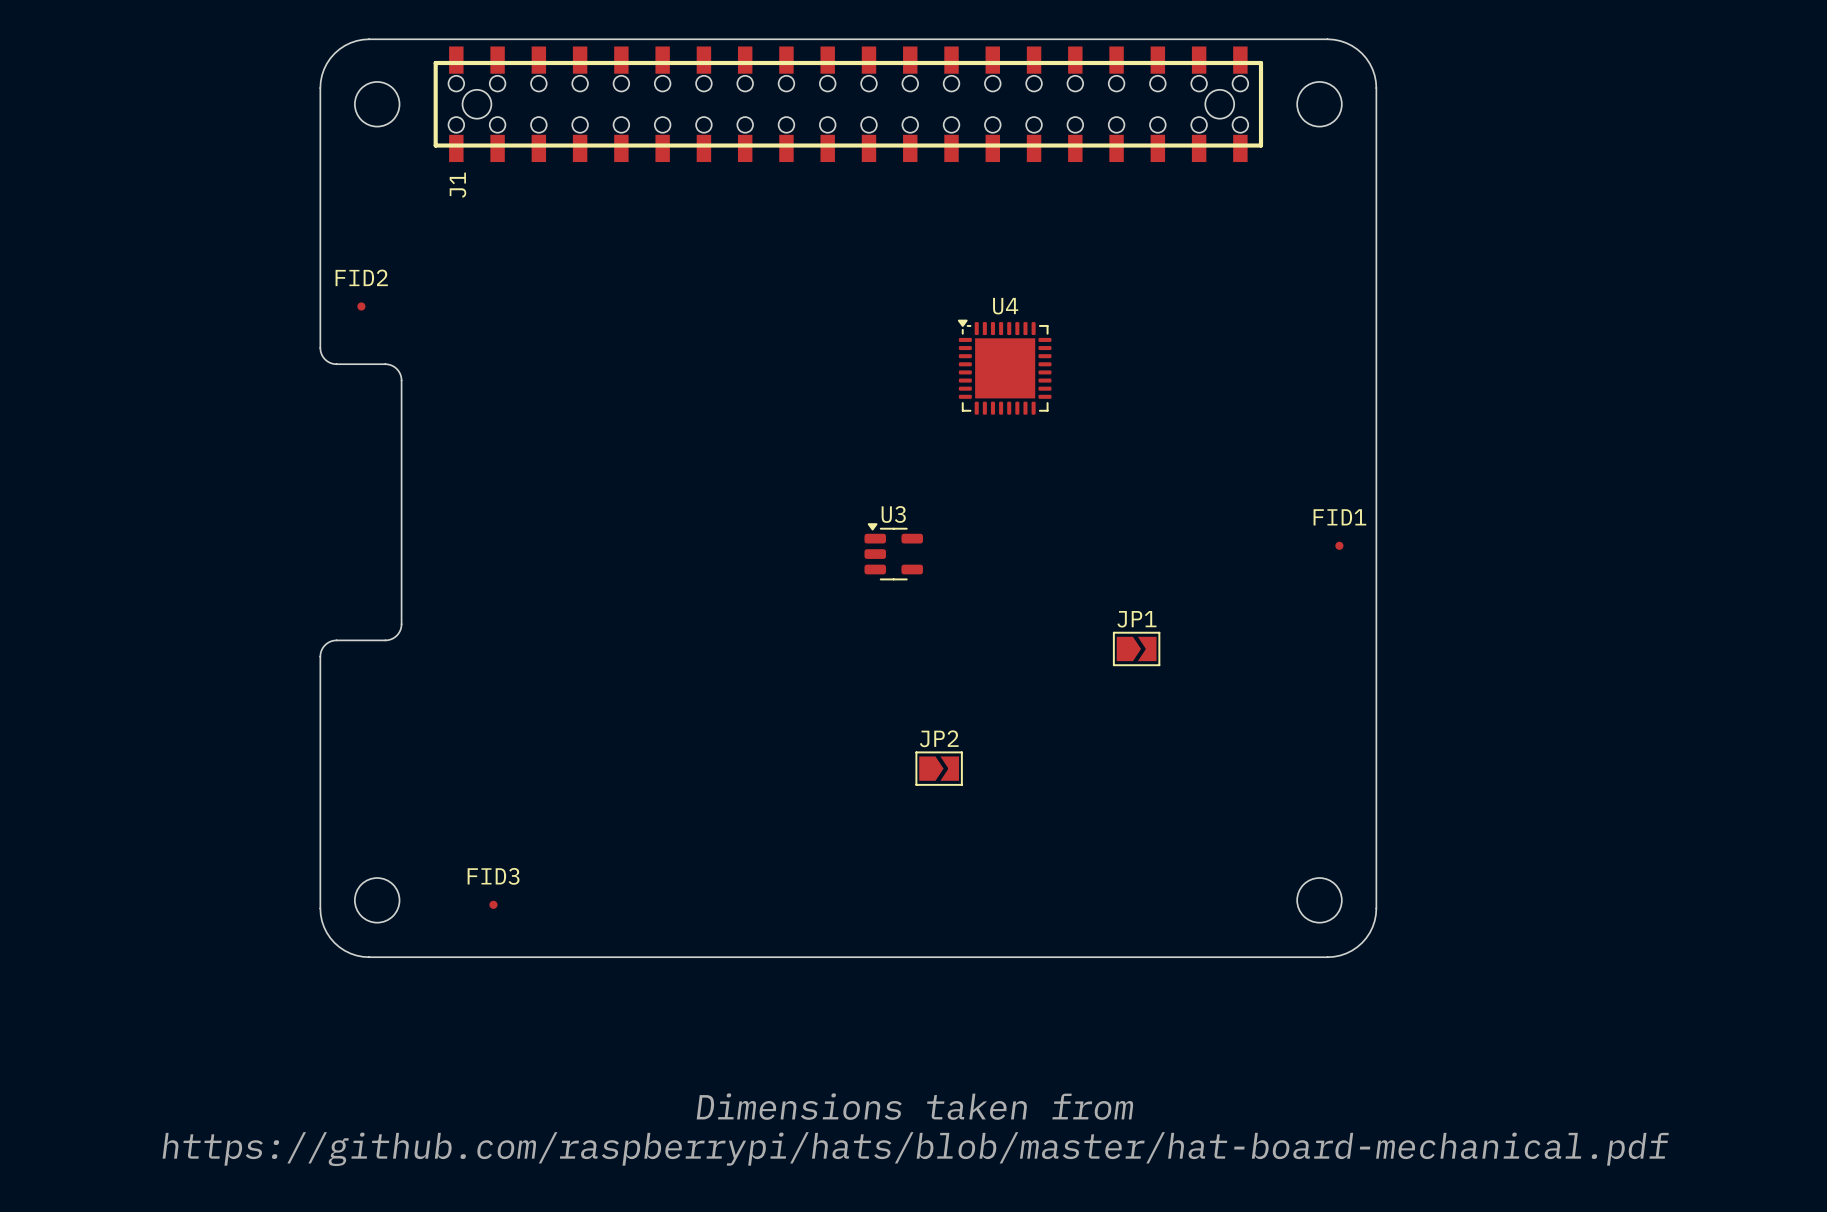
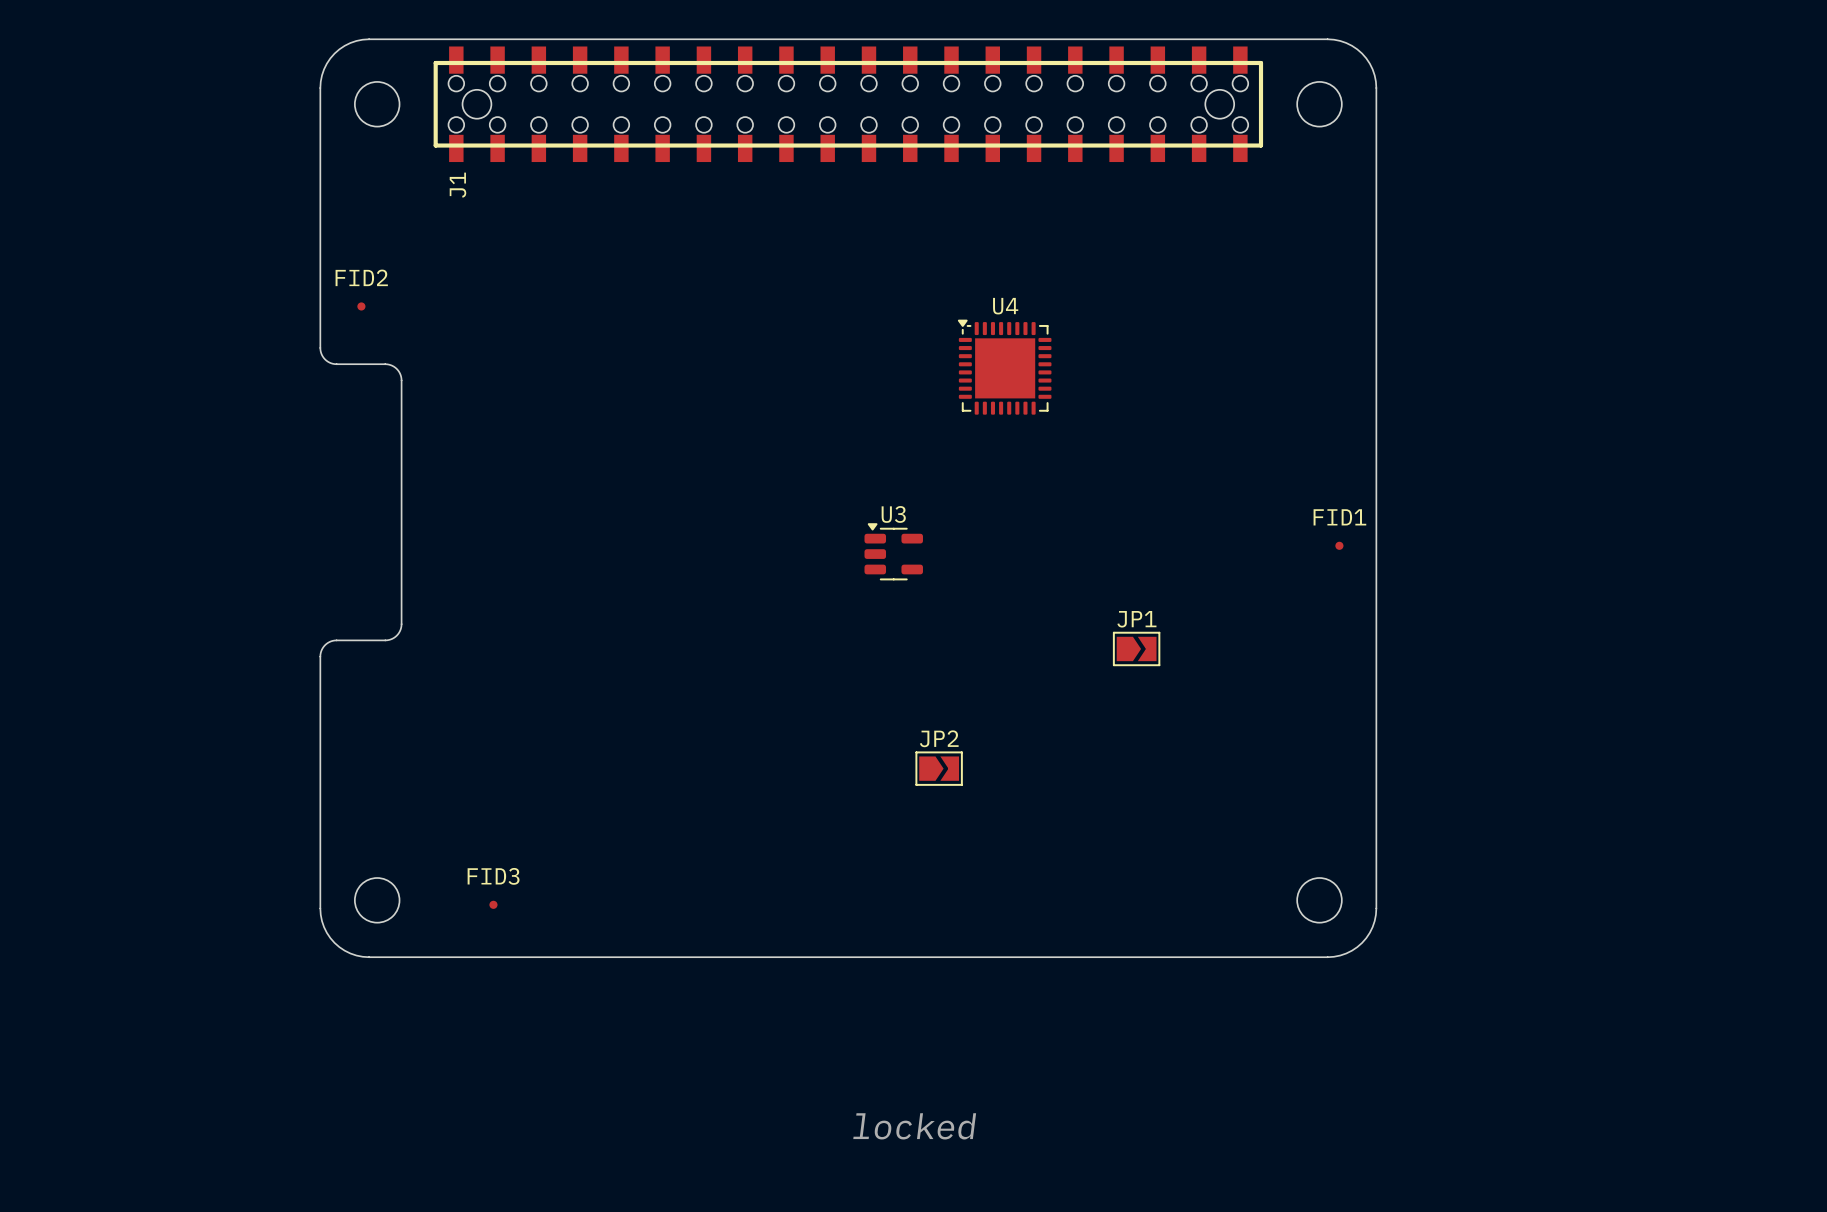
text: Dimensions taken from (915, 1106) -> none
text: none -> locked (914, 1126)
text: https://github.com/raspberrypi/hats/blob/master/hat-board-mechanical.pdf (915, 1149) -> none

